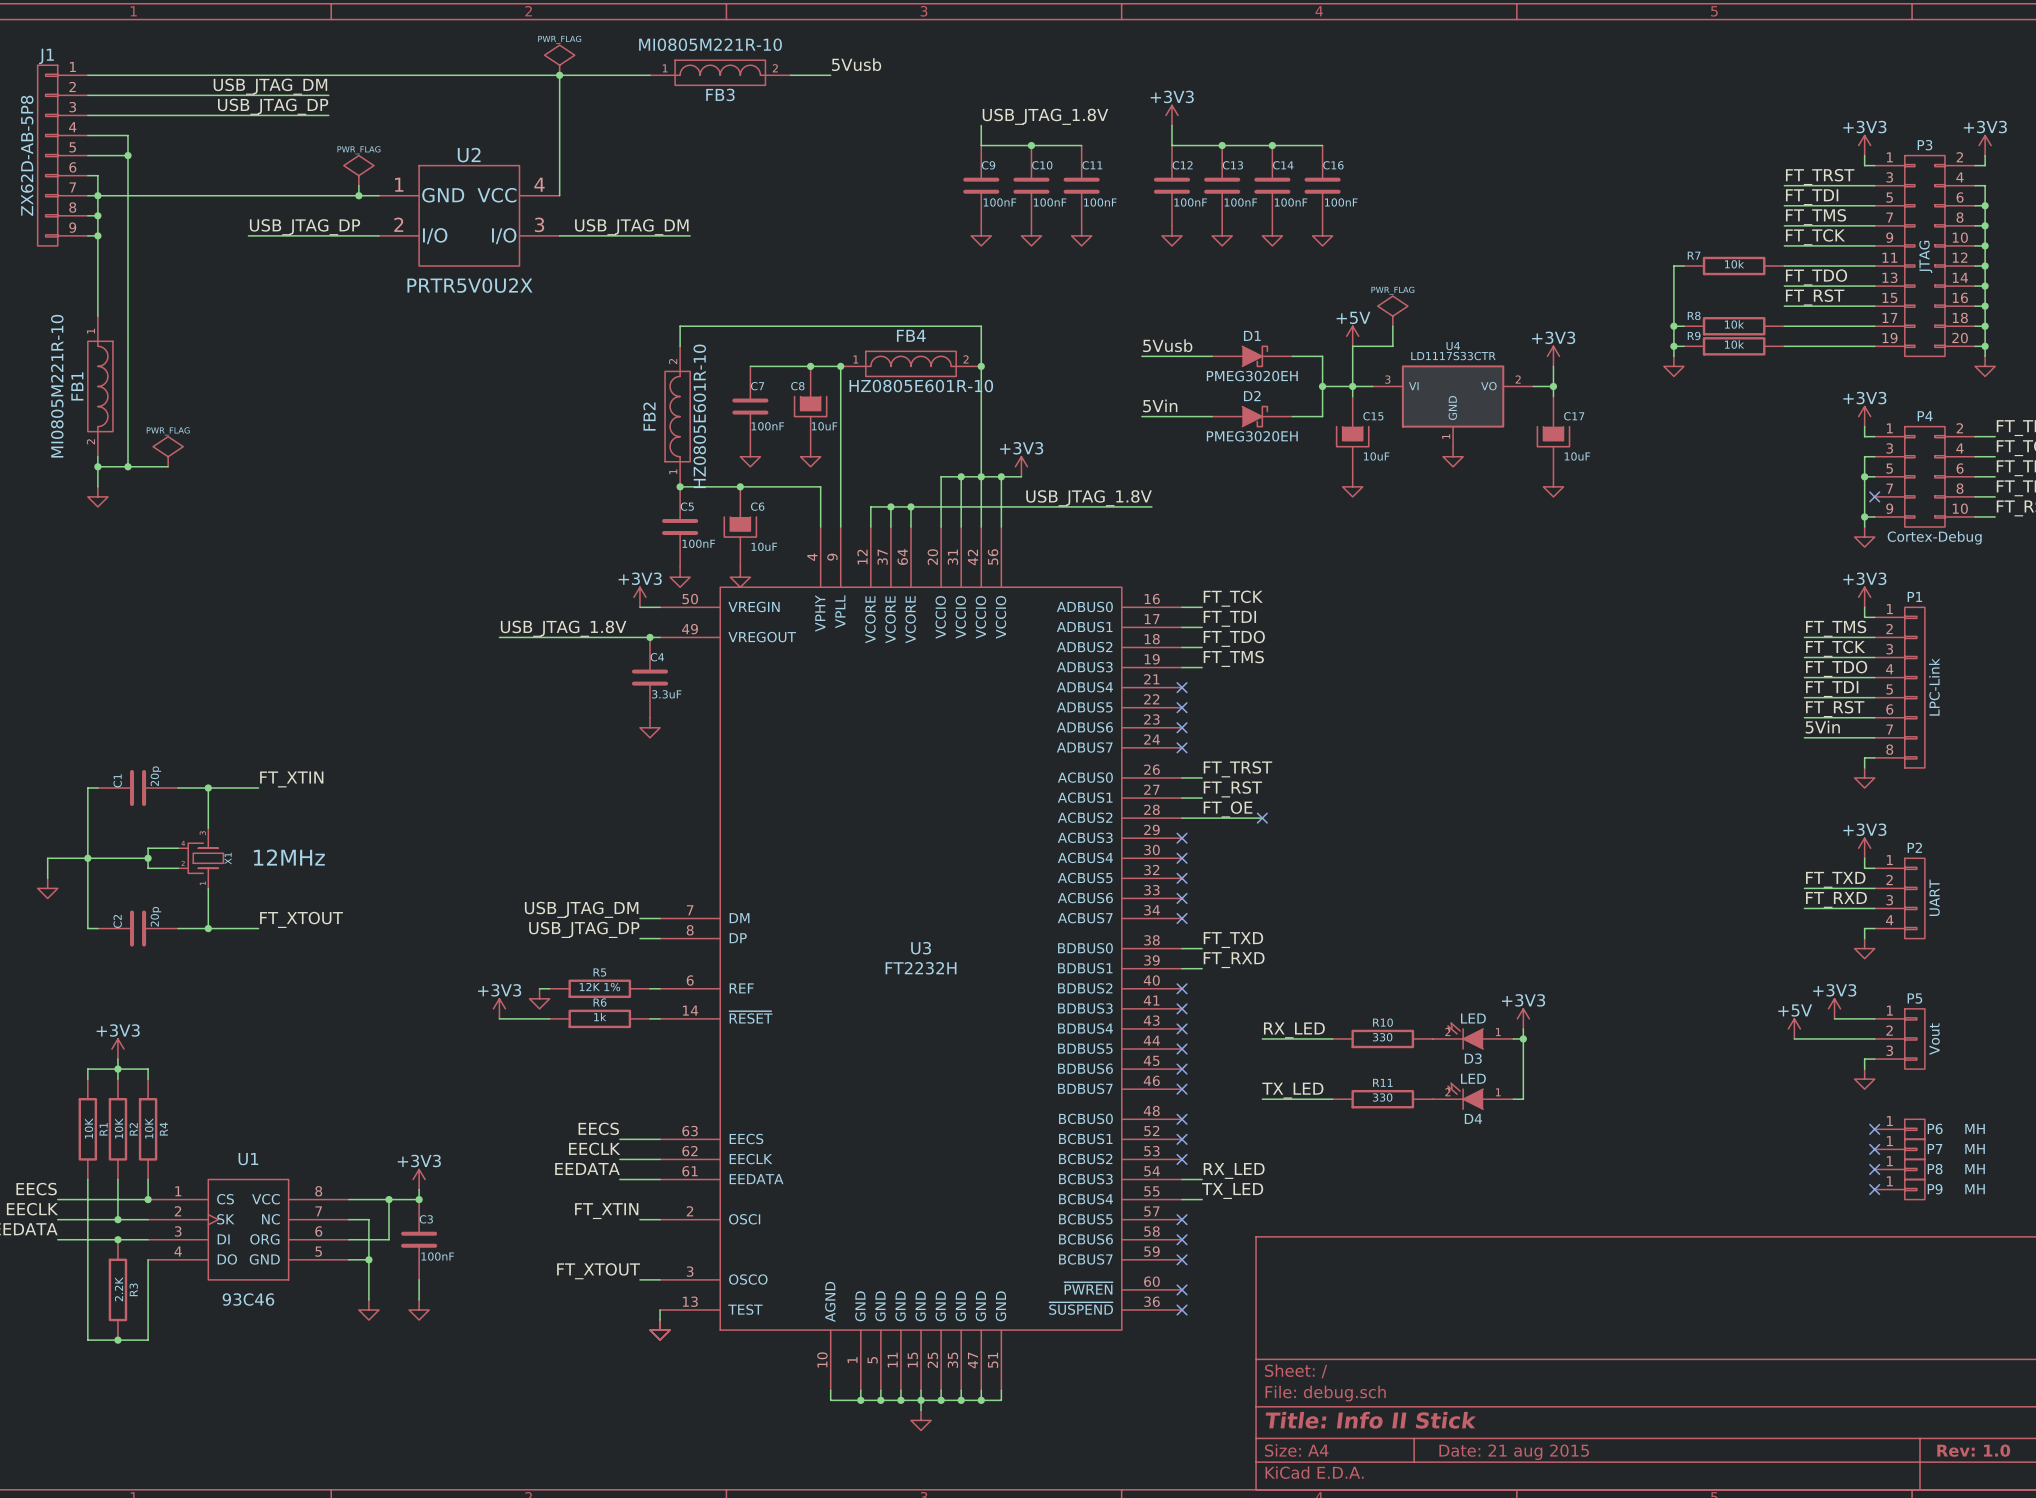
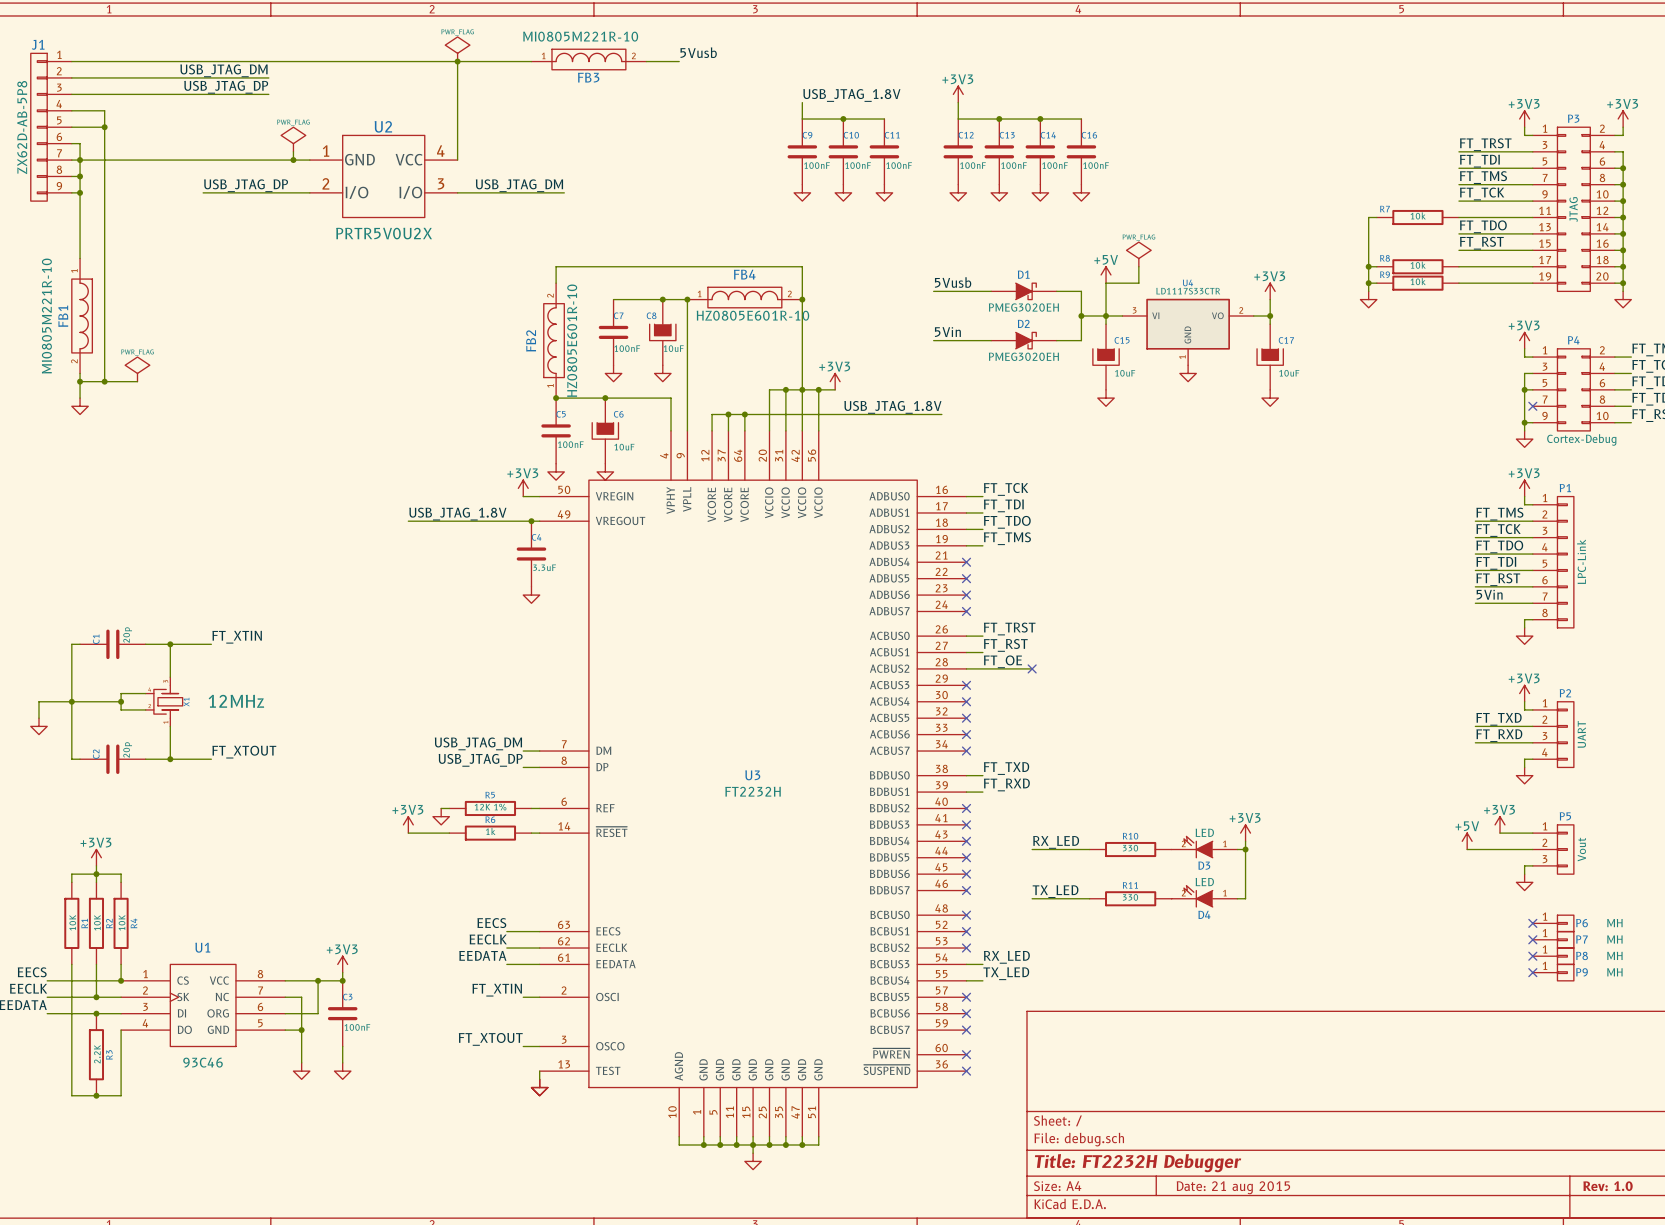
title block: Title: Info II Stick (1370, 1420) -> Title: FT2232H Debugger (1138, 1163)

